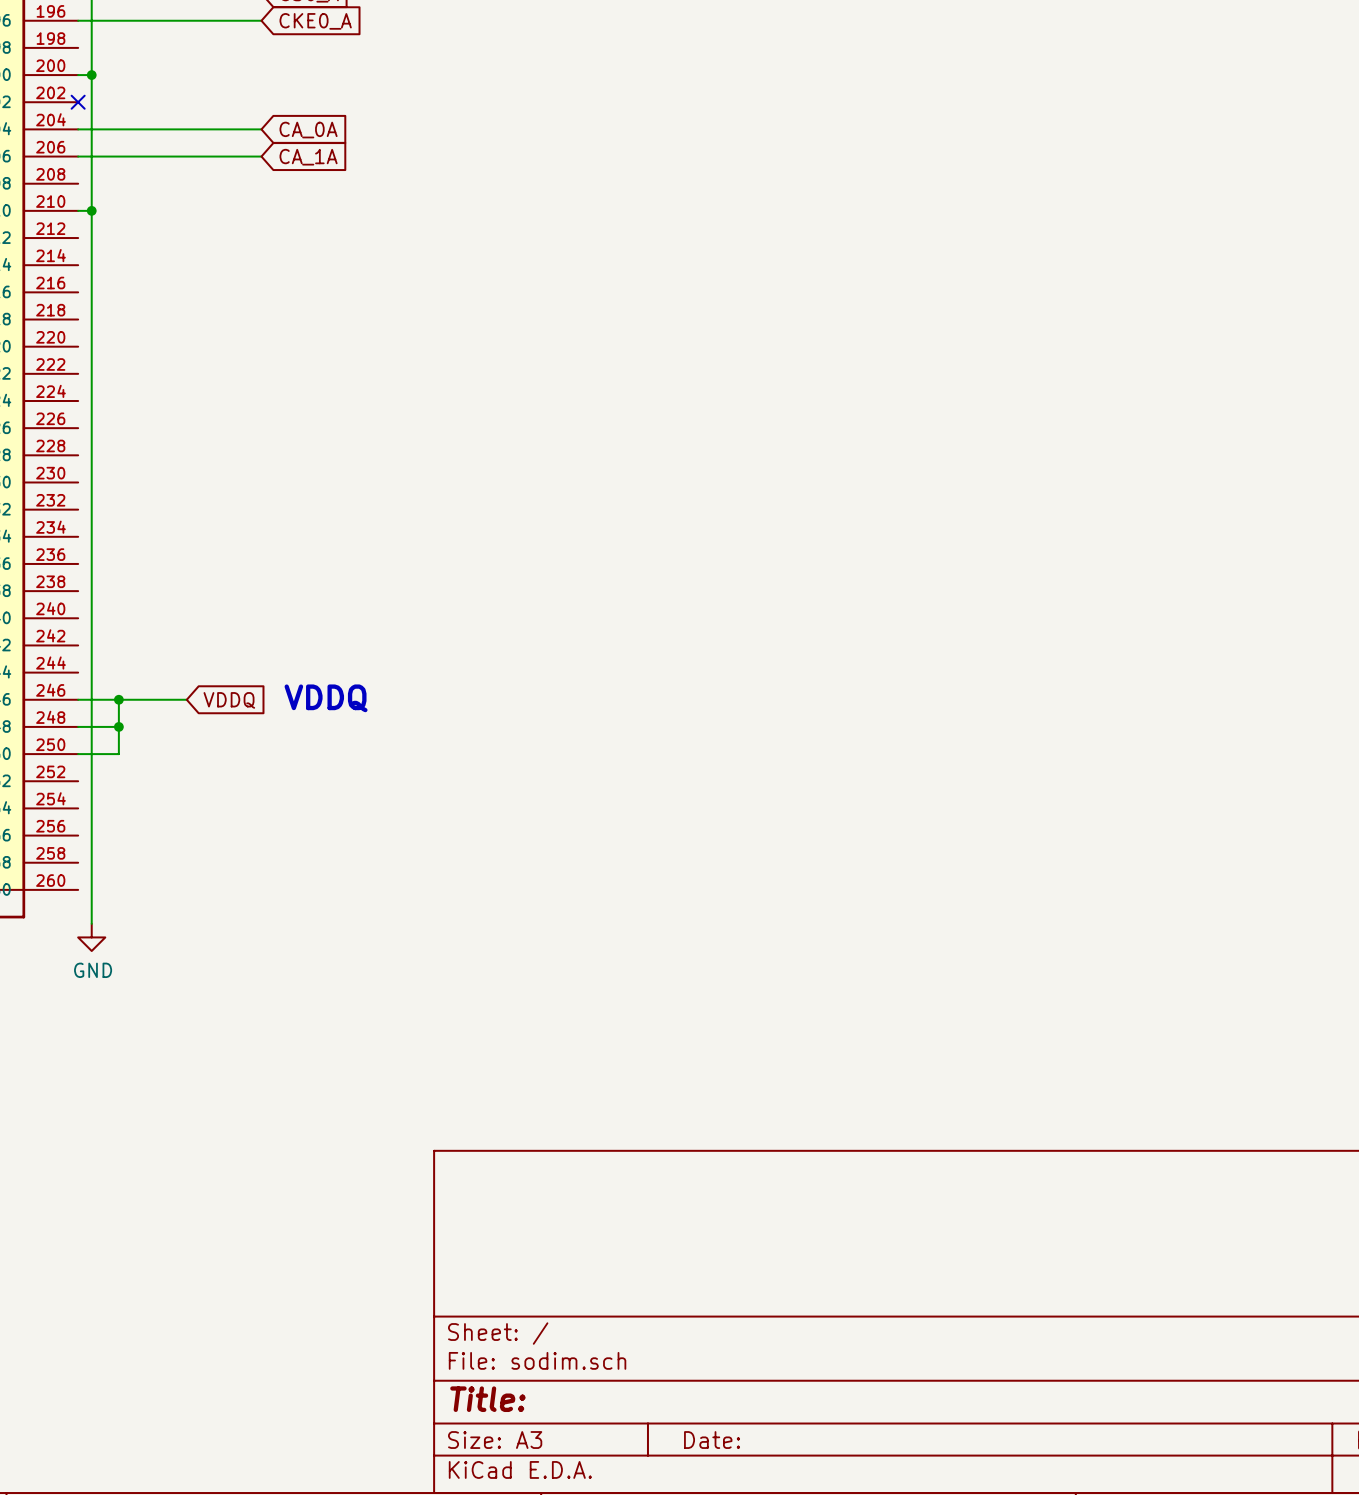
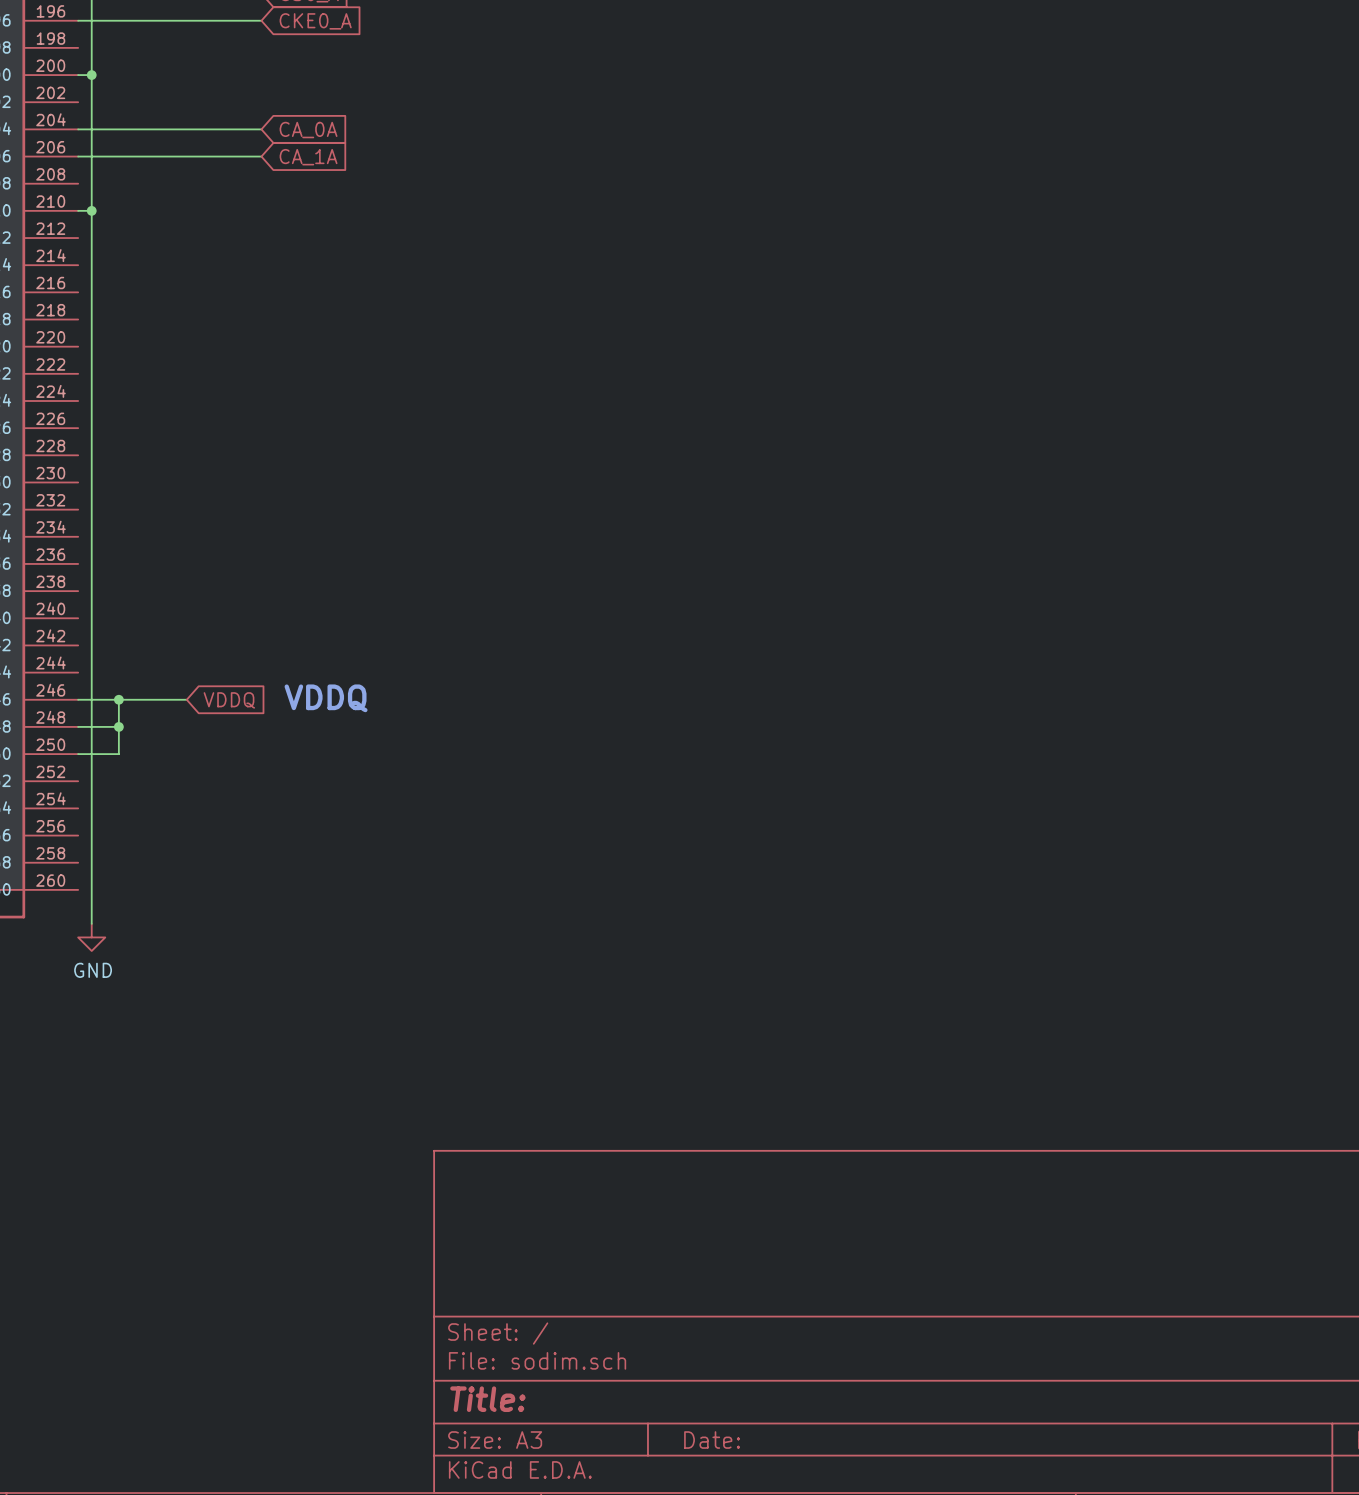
no-connect mark: (78, 102) -> none

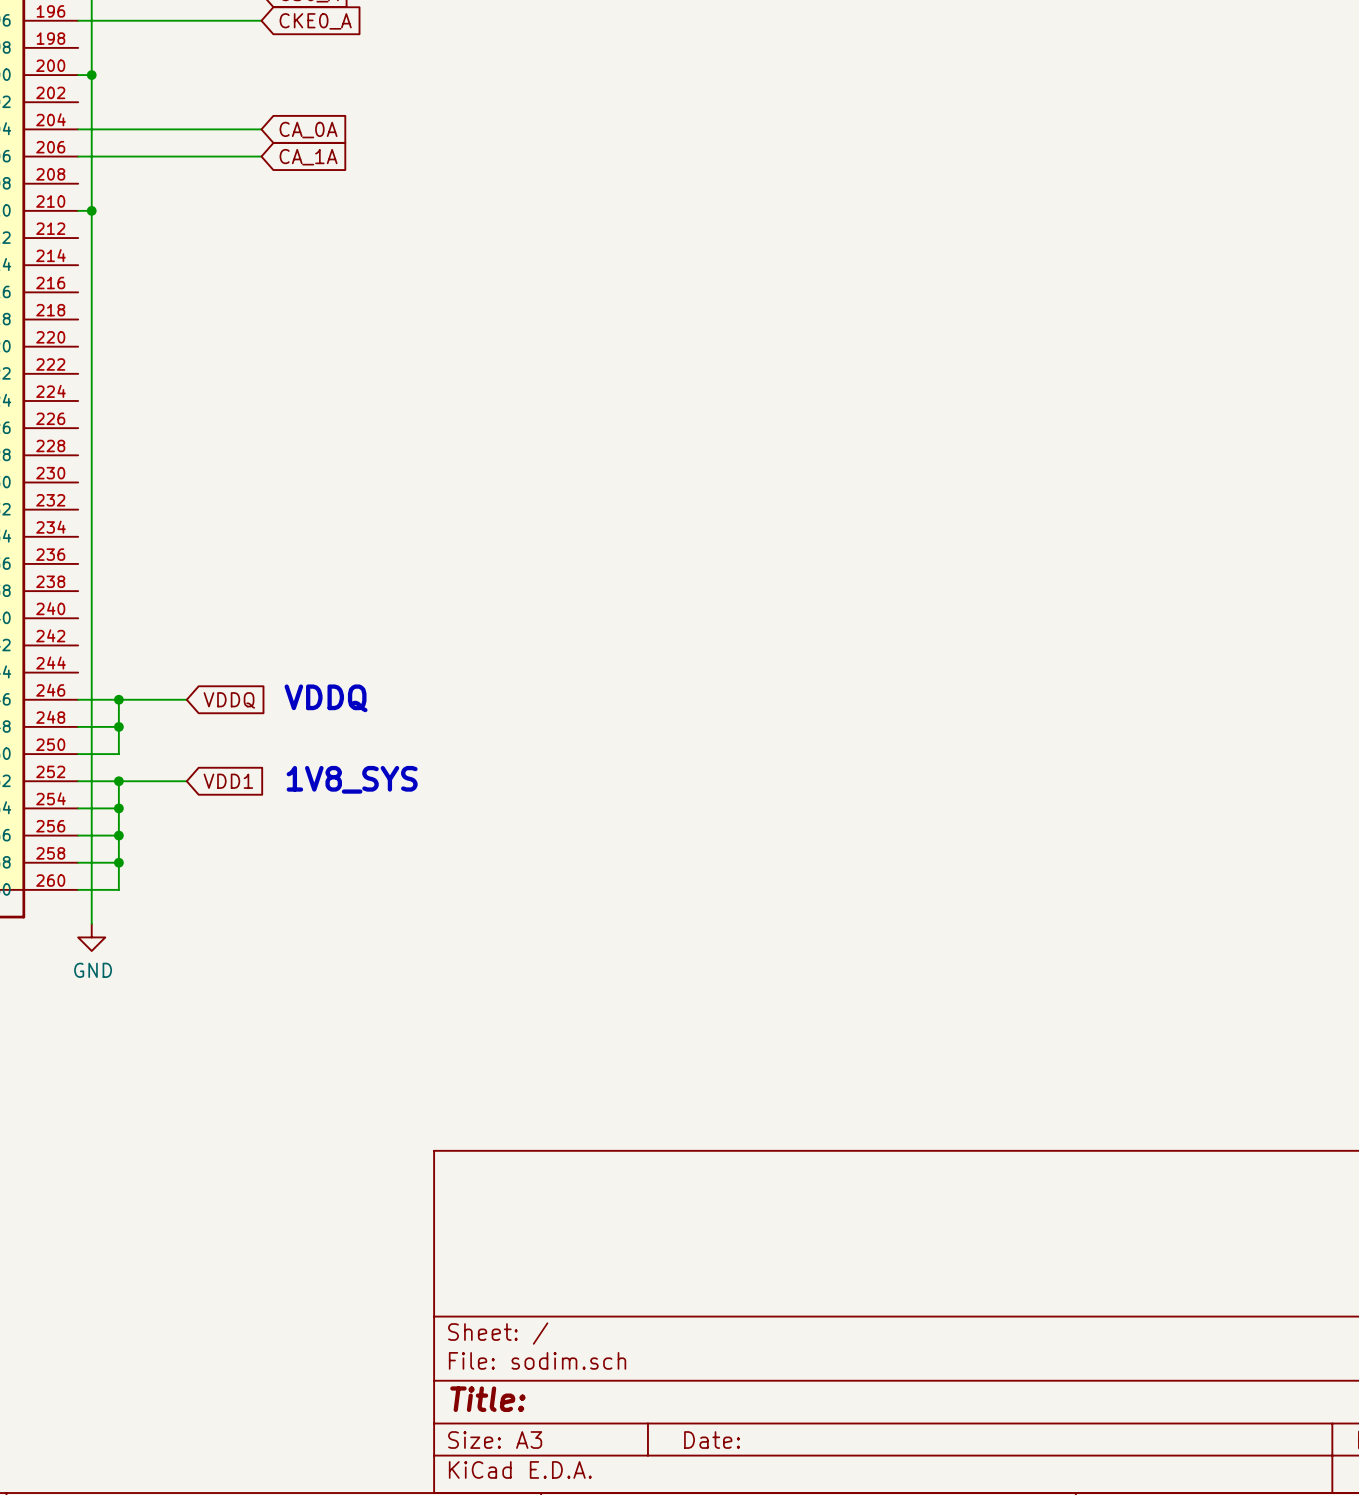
text: none -> 1V8_SYS (352, 779)
wire: none -> (78, 781) (186, 781)
wire: none -> (118, 781) (118, 889) (78, 889)
junction: none -> (118, 781)
global label: none -> VDD1 (228, 781)
wire: none -> (78, 808) (118, 808)
junction: none -> (118, 808)
wire: none -> (78, 835) (118, 835)
junction: none -> (118, 835)
wire: none -> (78, 862) (118, 862)
junction: none -> (118, 862)

